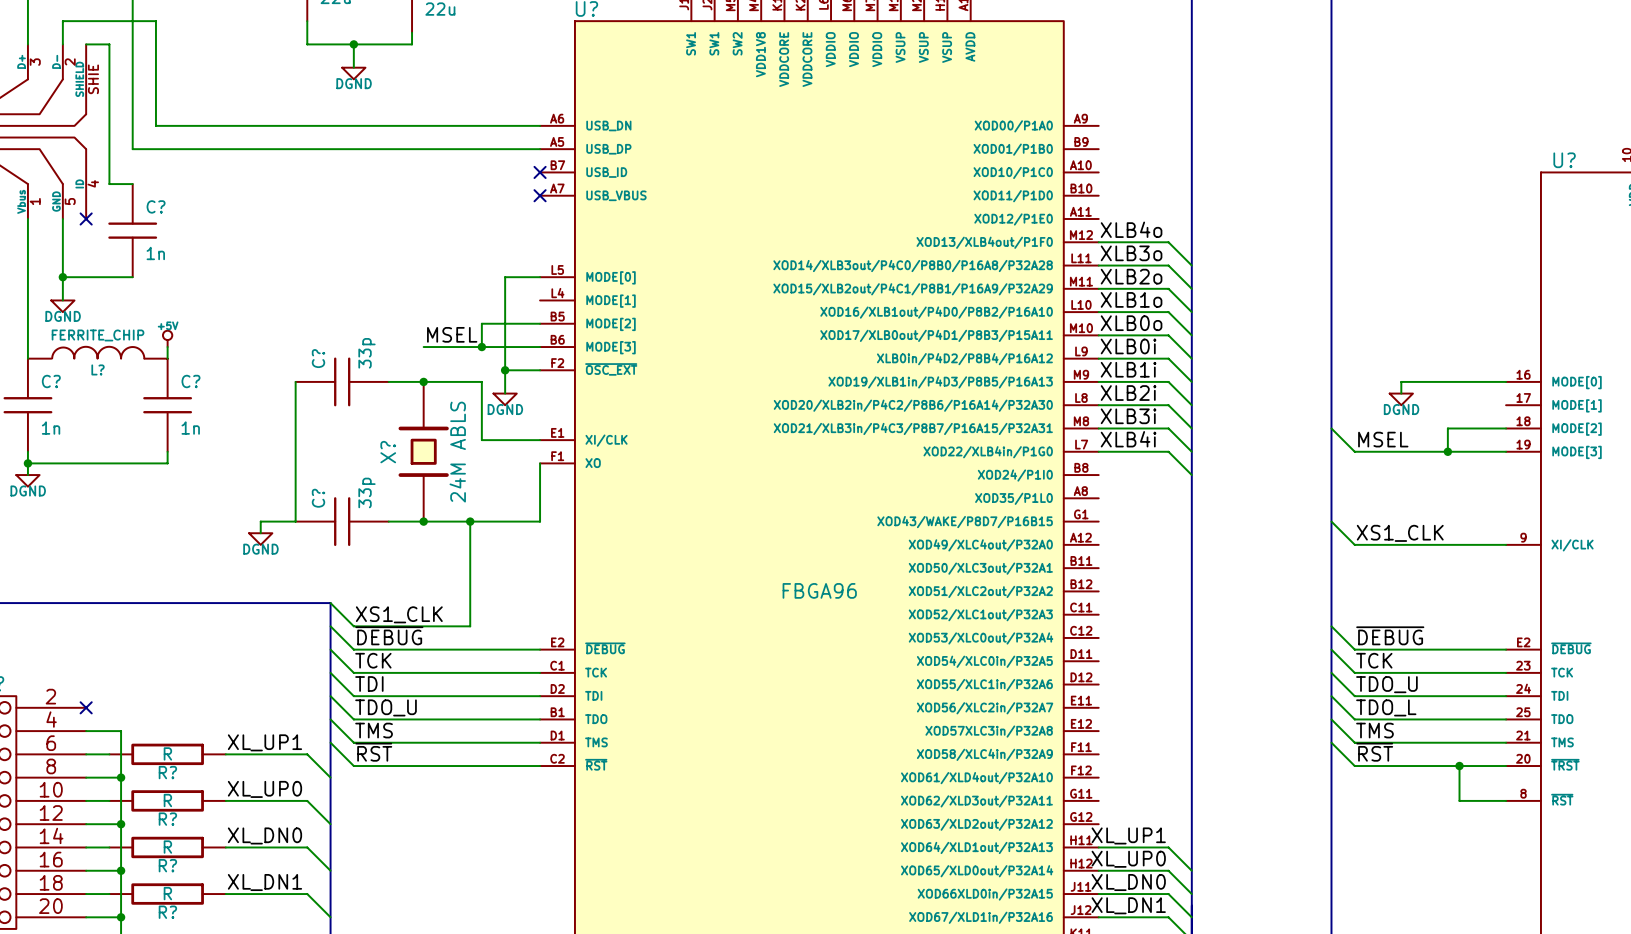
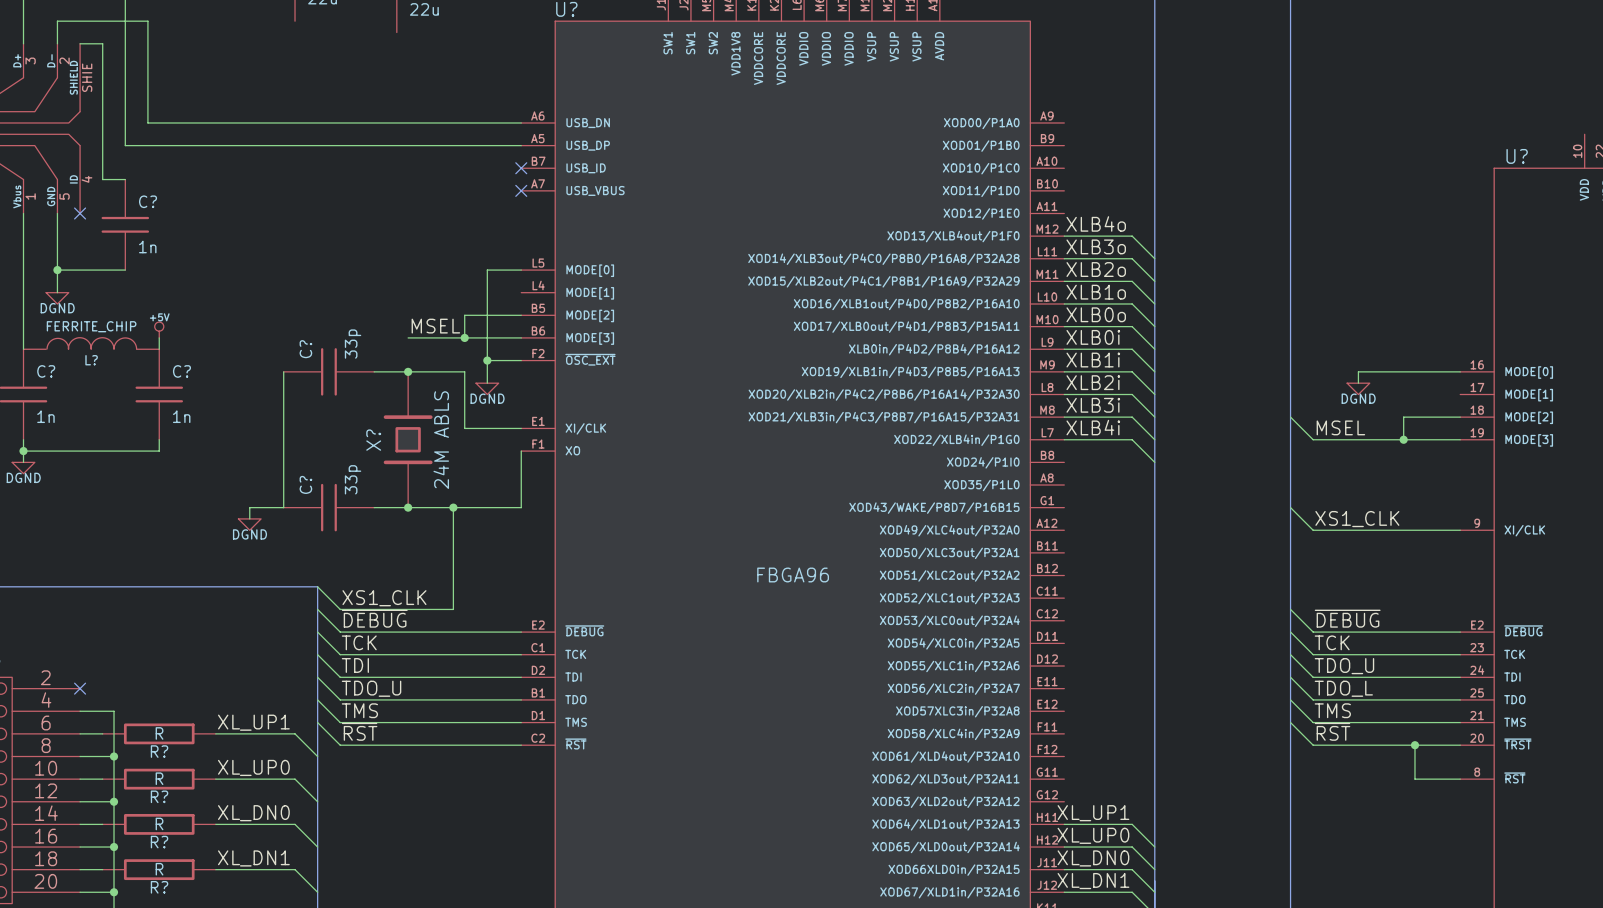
wire: (307, 21) (307, 44) (412, 44) (412, 32) -> none
wire: (353, 44) (353, 67) -> none
junction: (353, 44) -> none
power symbol: DGND (353, 73) -> none

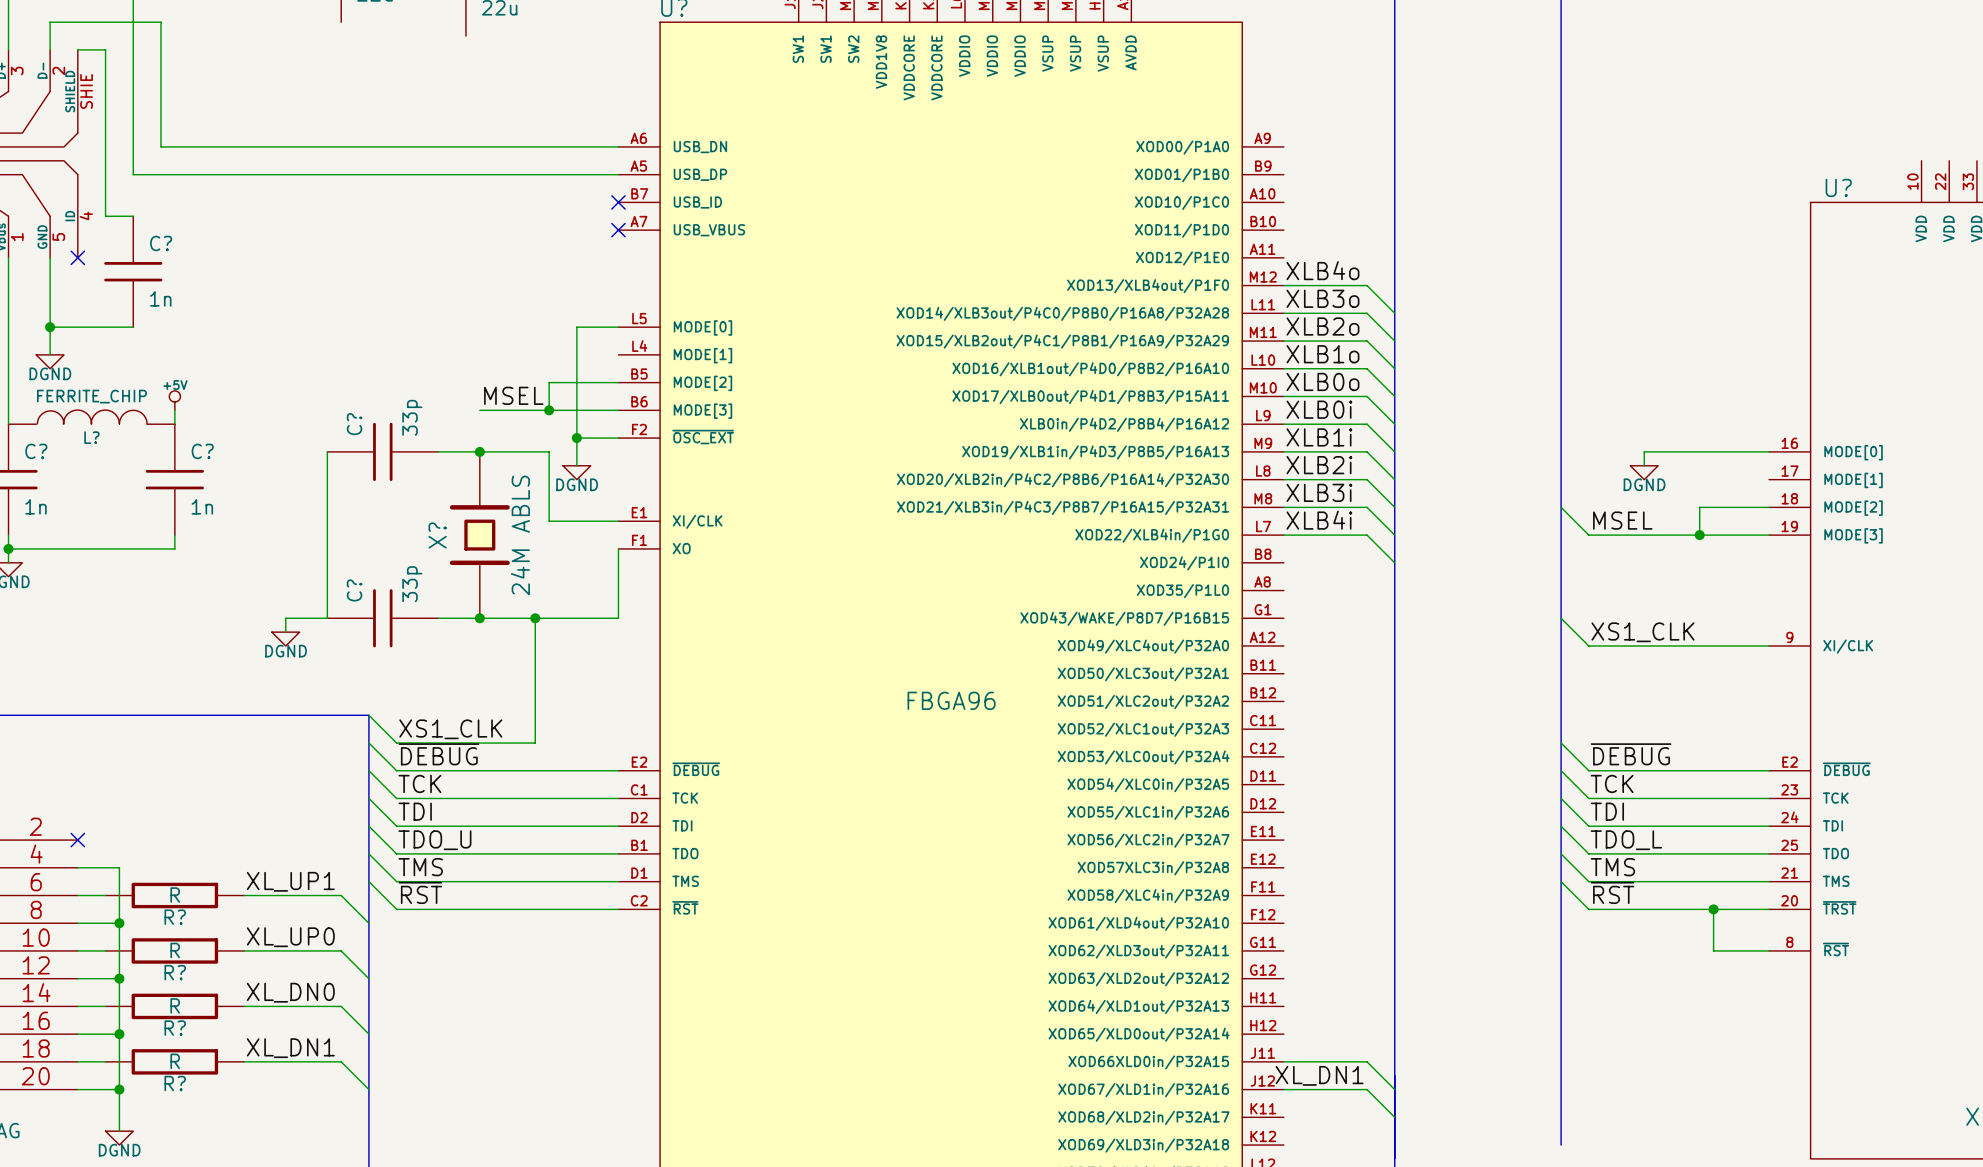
label: TDO_U (1344, 666) -> TDI (1607, 811)
label: XL_UP1 (1093, 813) -> none
wire: (1064, 824) (1132, 824) (1154, 847) -> none
label: XL_UP0 (1093, 835) -> none
wire: (1064, 847) (1132, 847) (1154, 869) -> none
label: XL_DN0 (1093, 858) -> none

